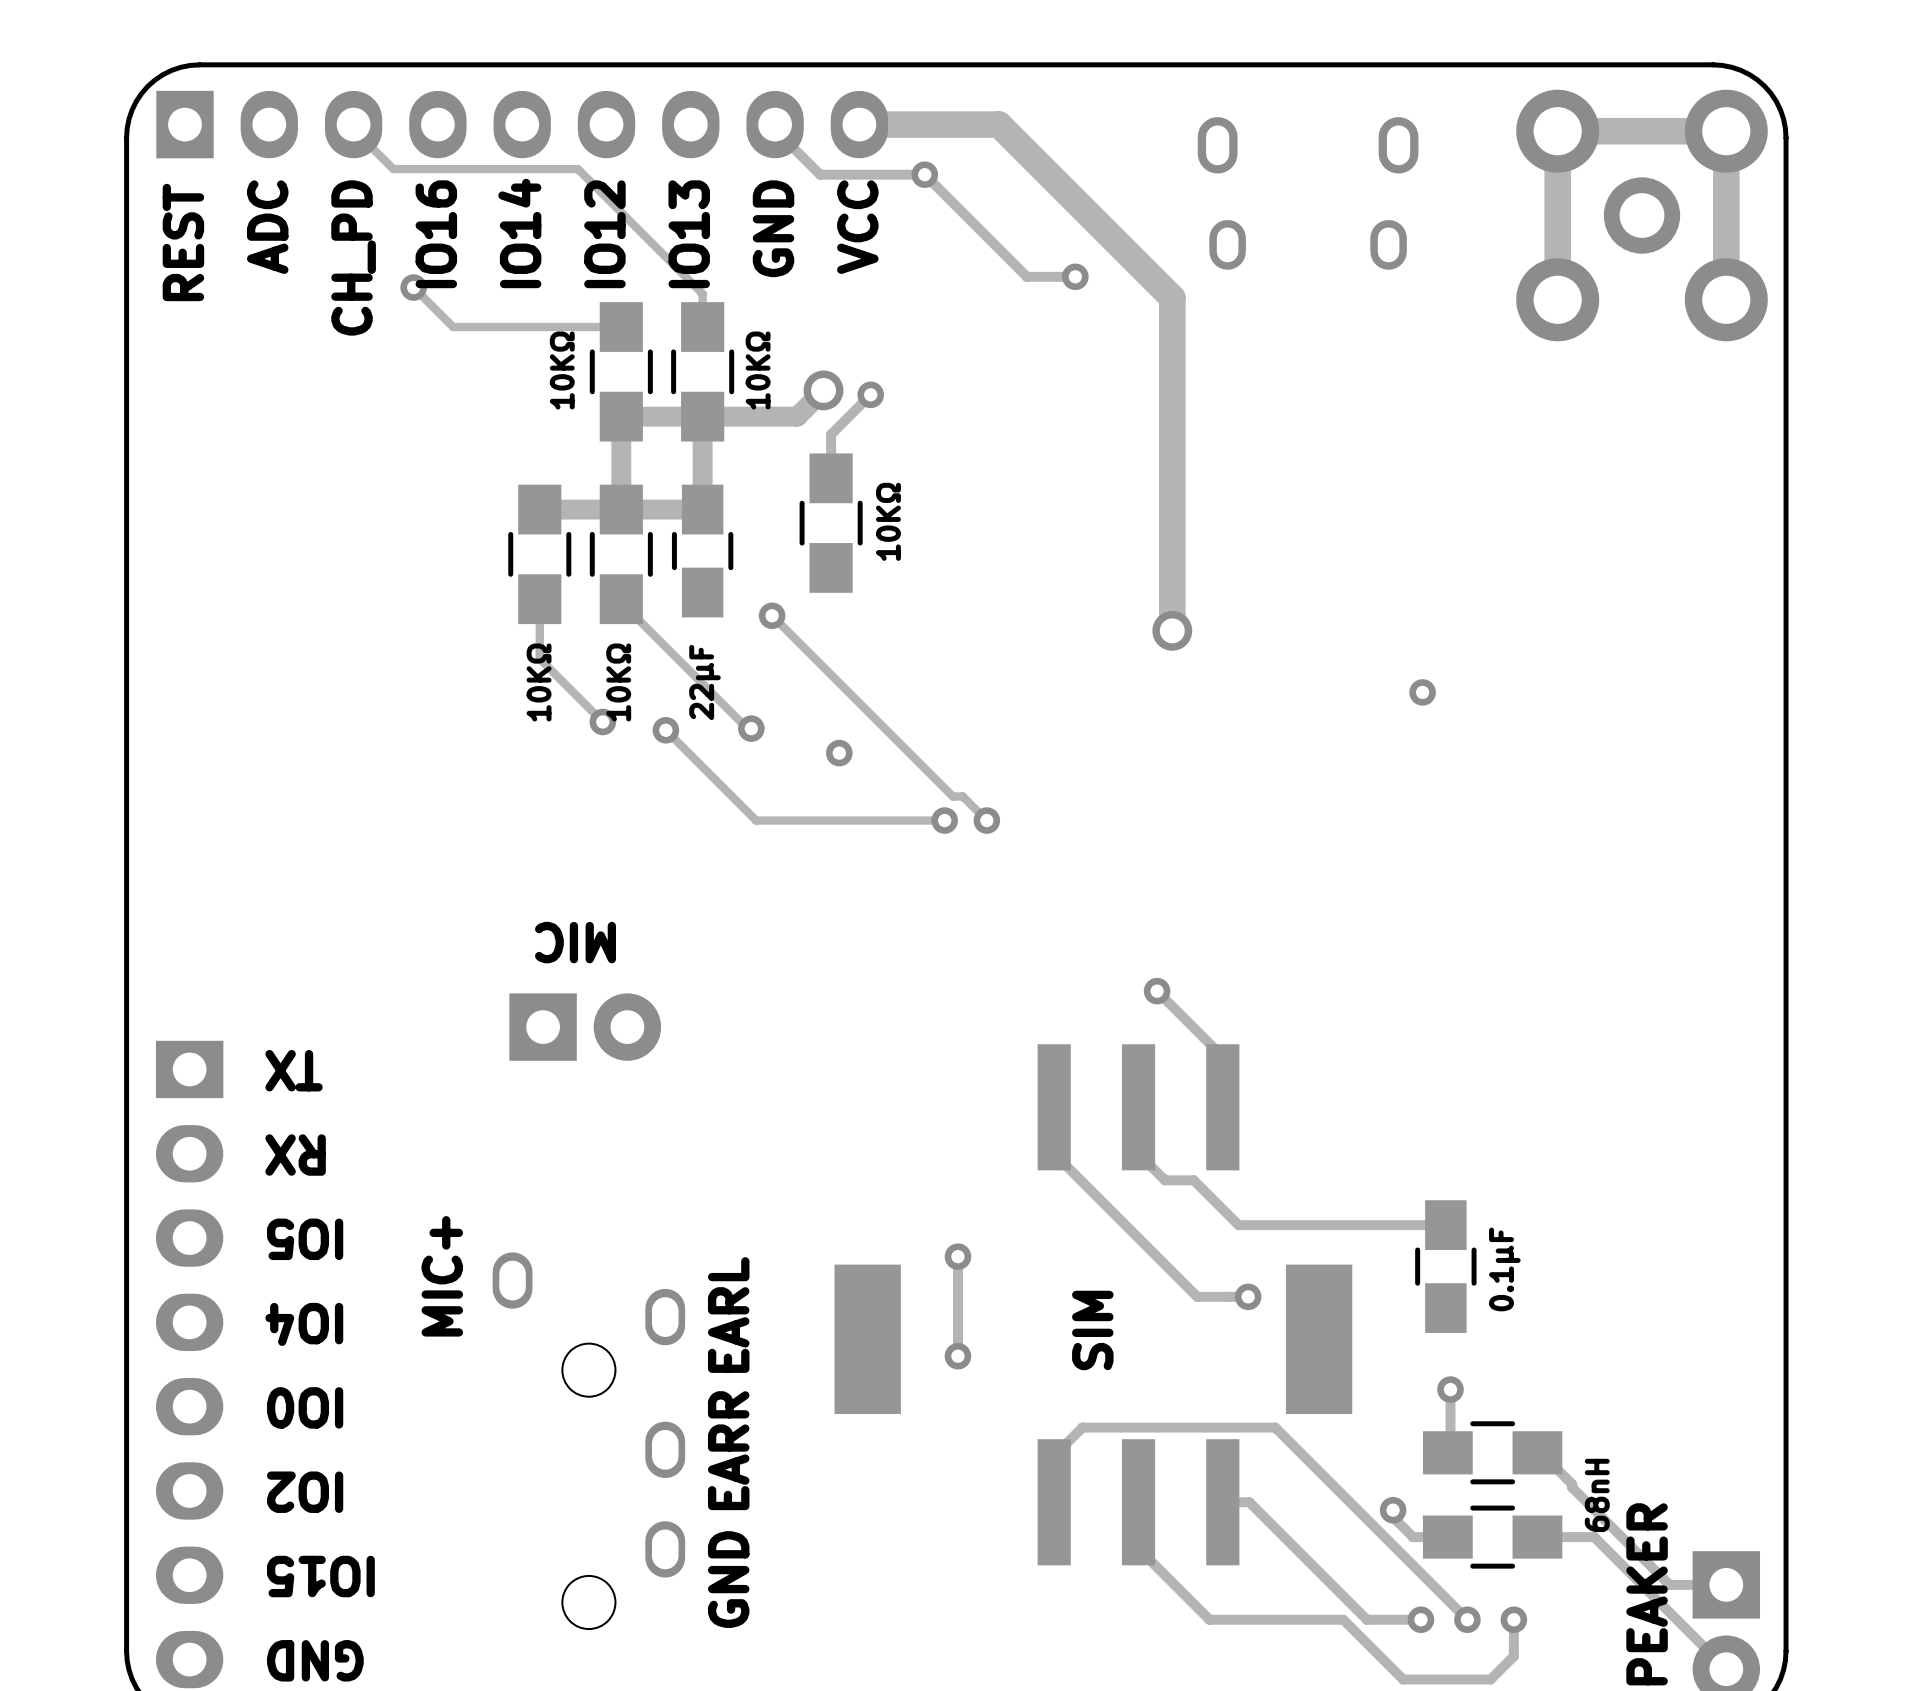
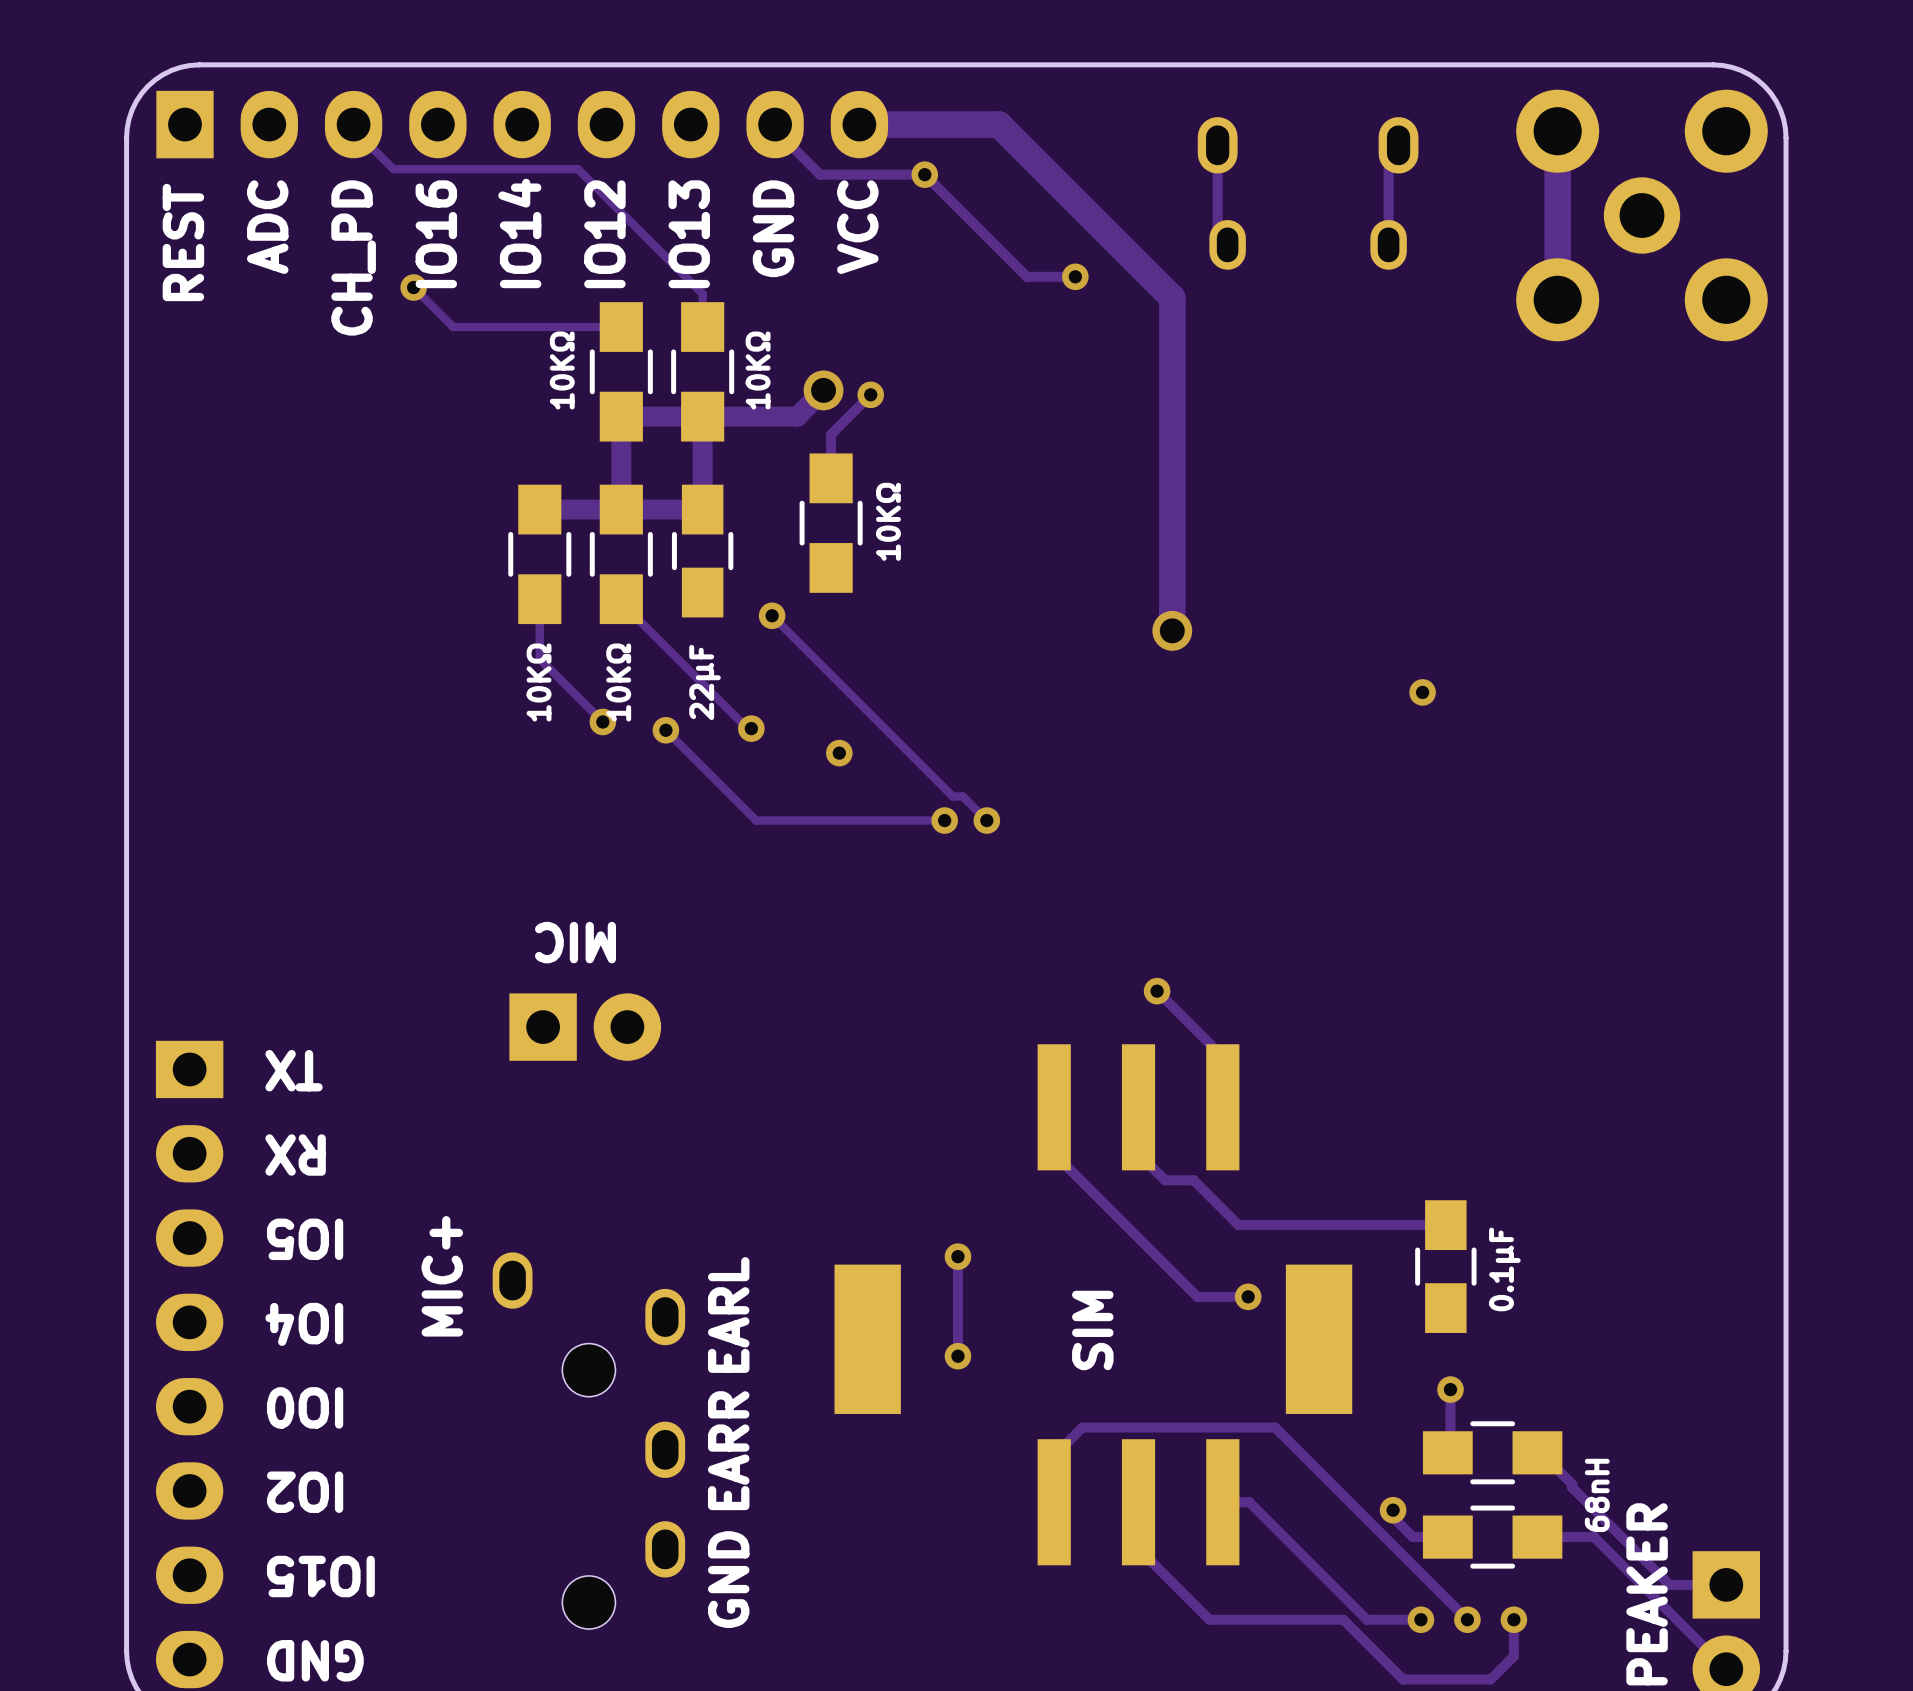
track: (1557, 131) (1726, 131) (1726, 299) -> none
track: none -> (1217, 145) (1217, 234) (1227, 244)
track: none -> (1398, 145) (1388, 155) (1388, 244)

